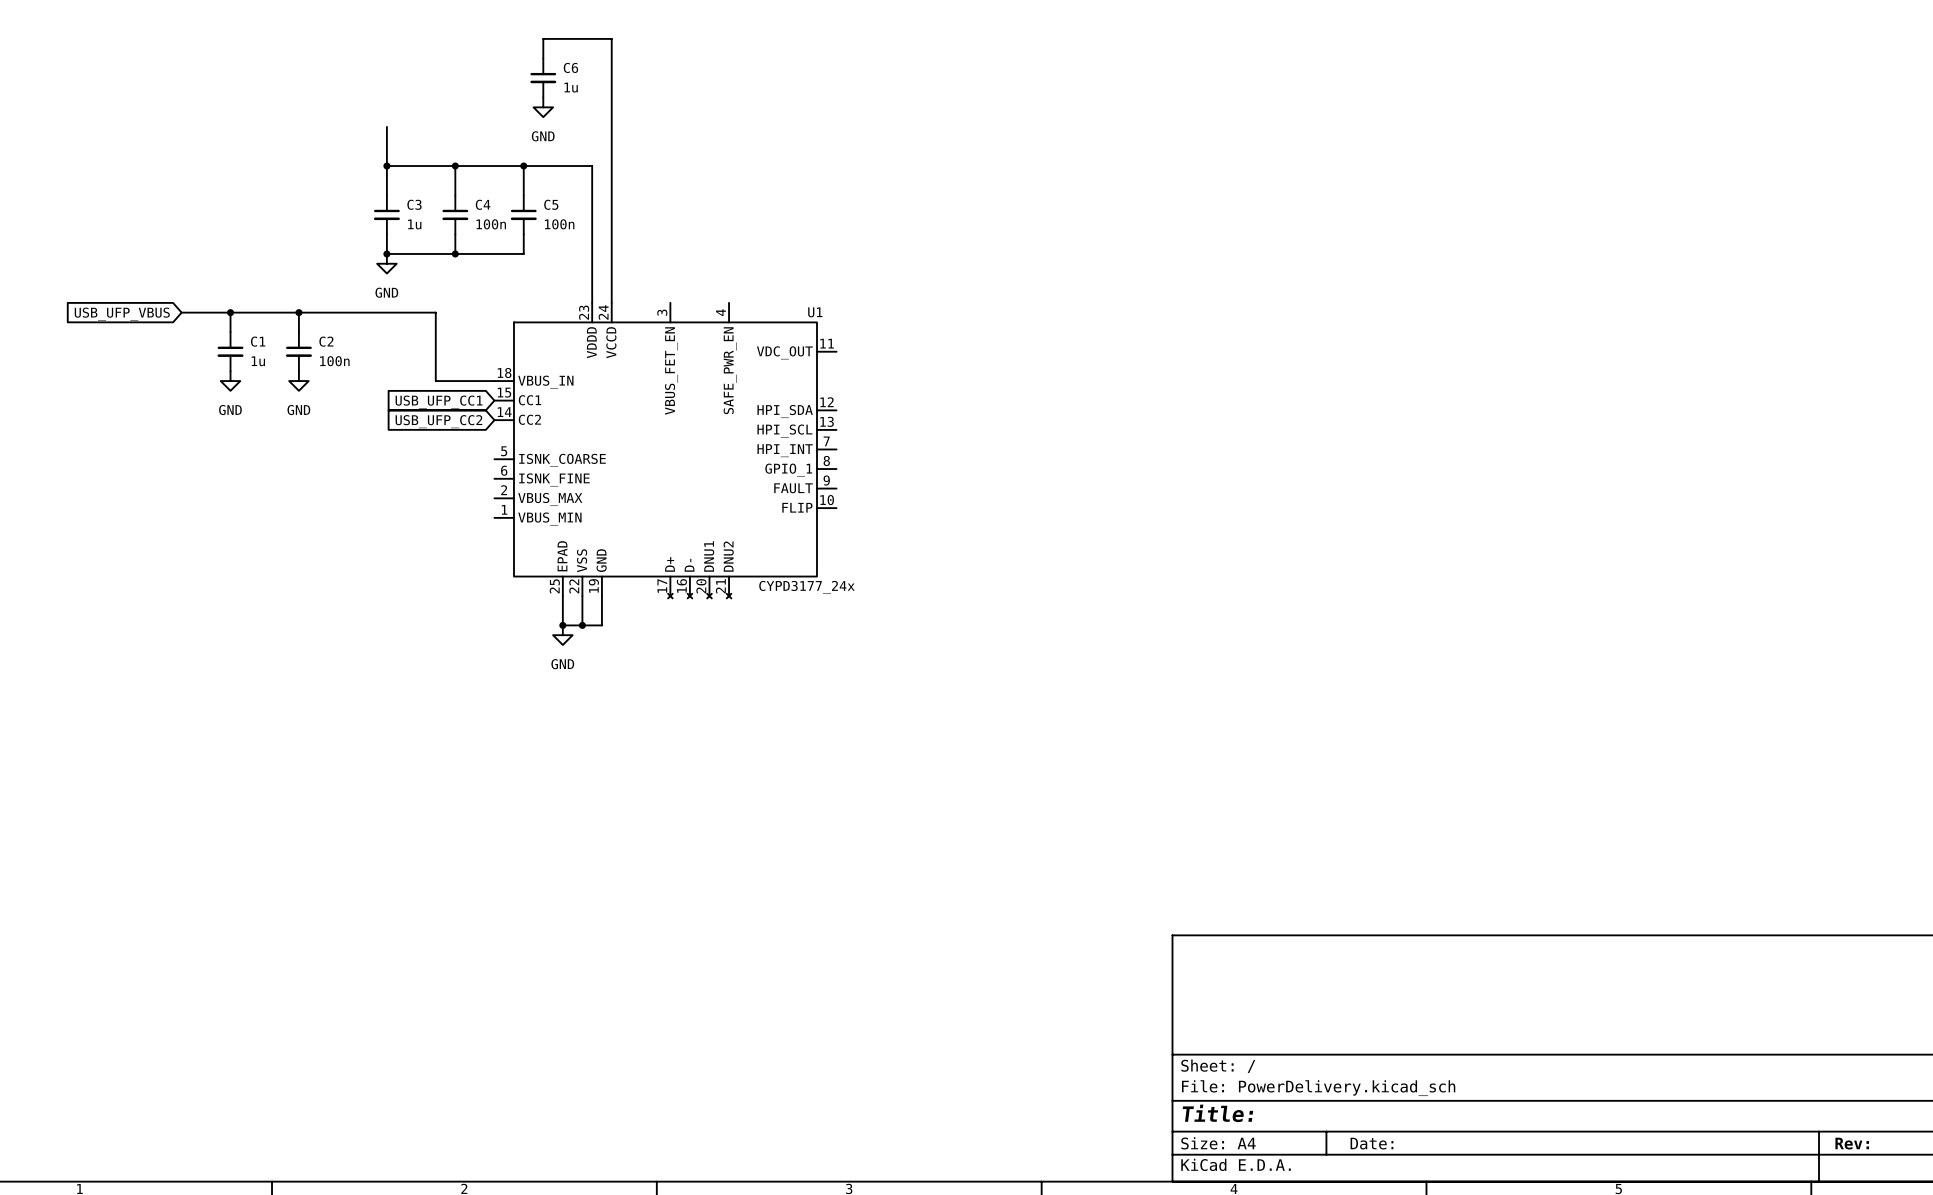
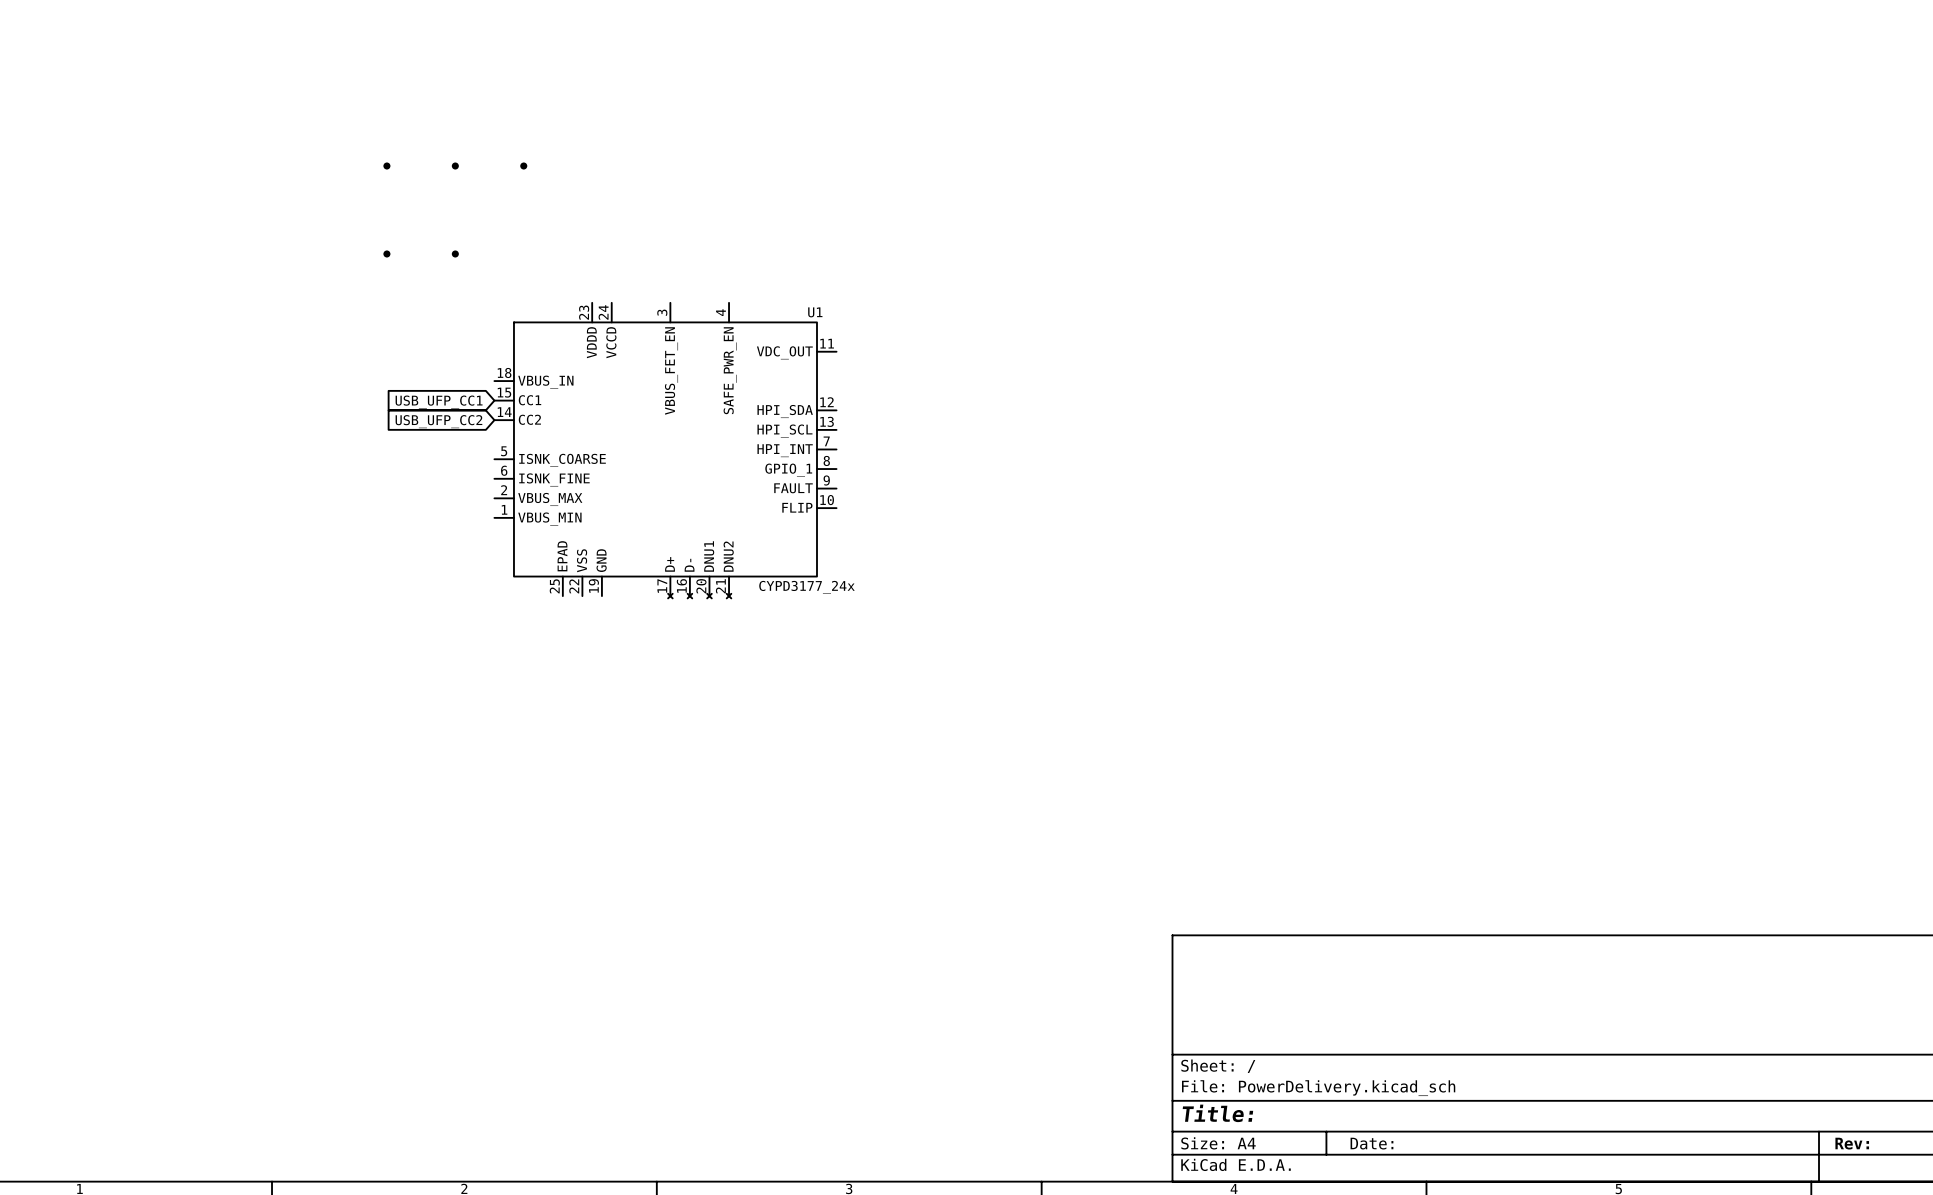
wire: (543, 58) (543, 38) (611, 38) (611, 302) -> none
C6: 1u (543, 78) -> none
power symbol: GND (543, 107) -> none
wire: (386, 126) (386, 195) -> none
wire: (386, 166) (592, 166) (592, 302) -> none
wire: (455, 166) (455, 195) -> none
wire: (523, 166) (523, 195) -> none
C3: 1u (386, 214) -> none
C4: 100n (455, 214) -> none
C5: 100n (523, 214) -> none
wire: (386, 234) (386, 253) (523, 253) (523, 234) -> none
wire: (455, 234) (455, 253) -> none
power symbol: GND (386, 263) -> none
wire: (181, 312) (435, 312) (435, 381) (494, 381) -> none
wire: (230, 312) (230, 332) -> none
junction: (230, 312) -> none
wire: (298, 312) (298, 332) -> none
junction: (298, 312) -> none
global label: USB_UFP_VBUS (122, 314) -> none
C1: 1u (230, 351) -> none
C2: 100n (298, 351) -> none
power symbol: GND (230, 381) -> none
power symbol: GND (298, 381) -> none
wire: (562, 596) (562, 625) (601, 625) (601, 596) -> none
wire: (582, 596) (582, 625) -> none
junction: (562, 625) -> none
junction: (582, 625) -> none
power symbol: GND (562, 635) -> none

